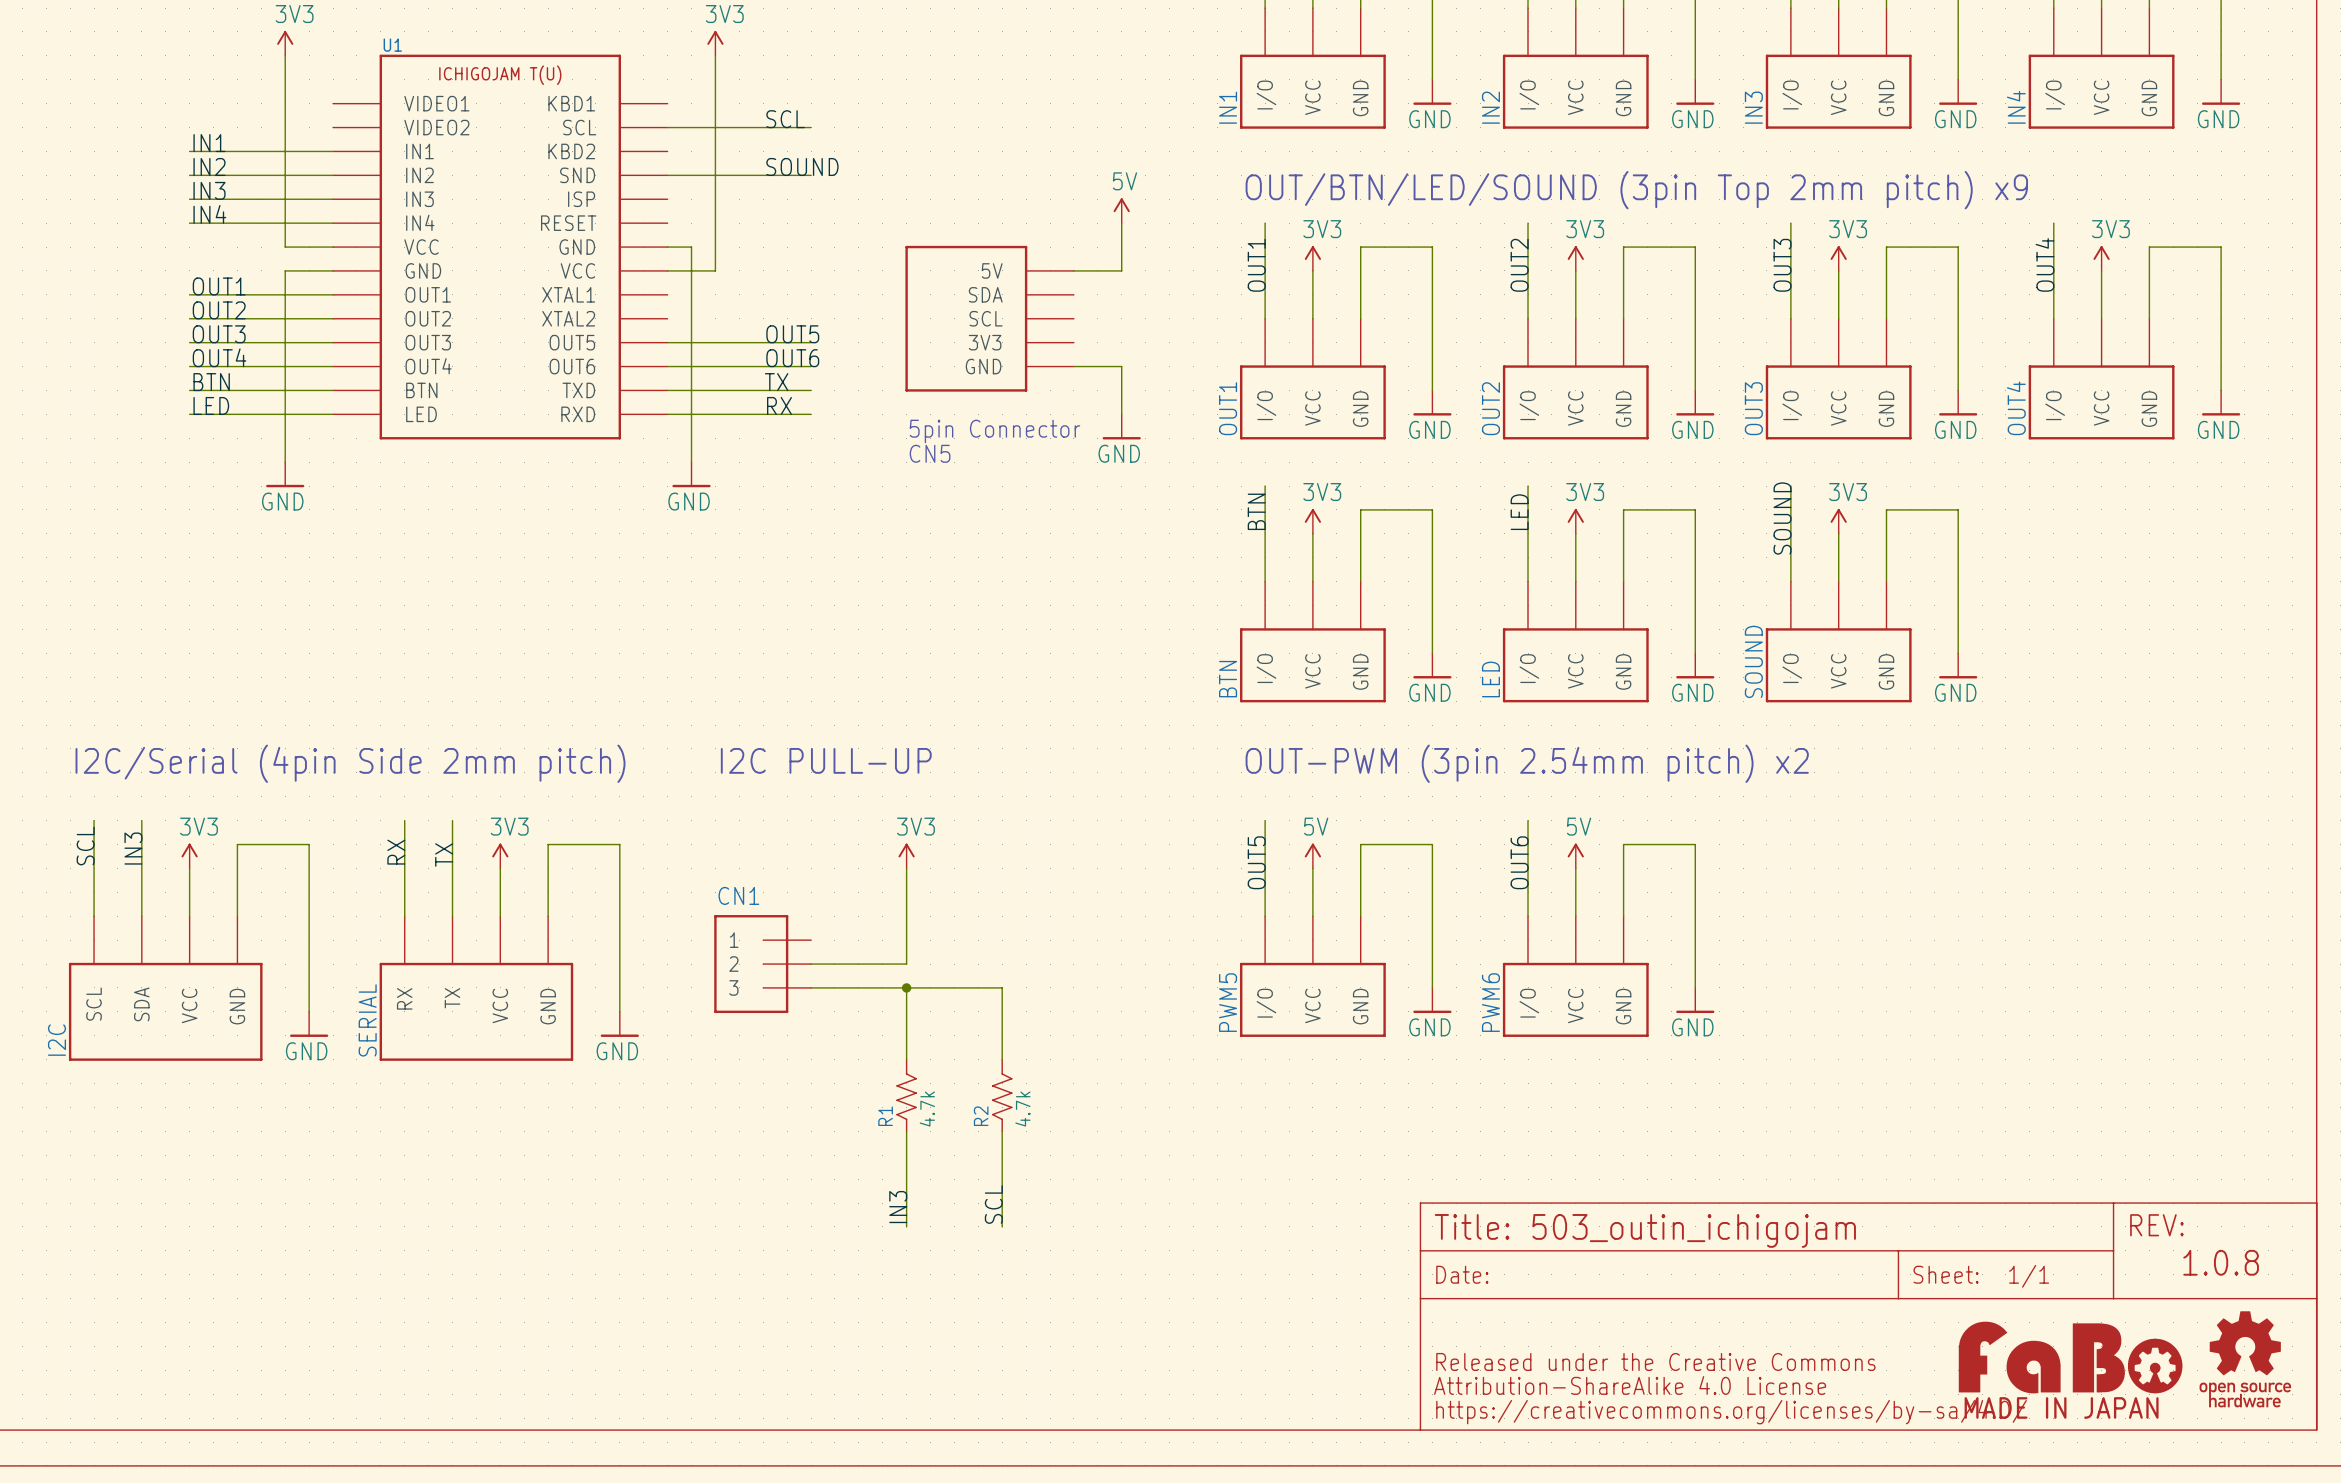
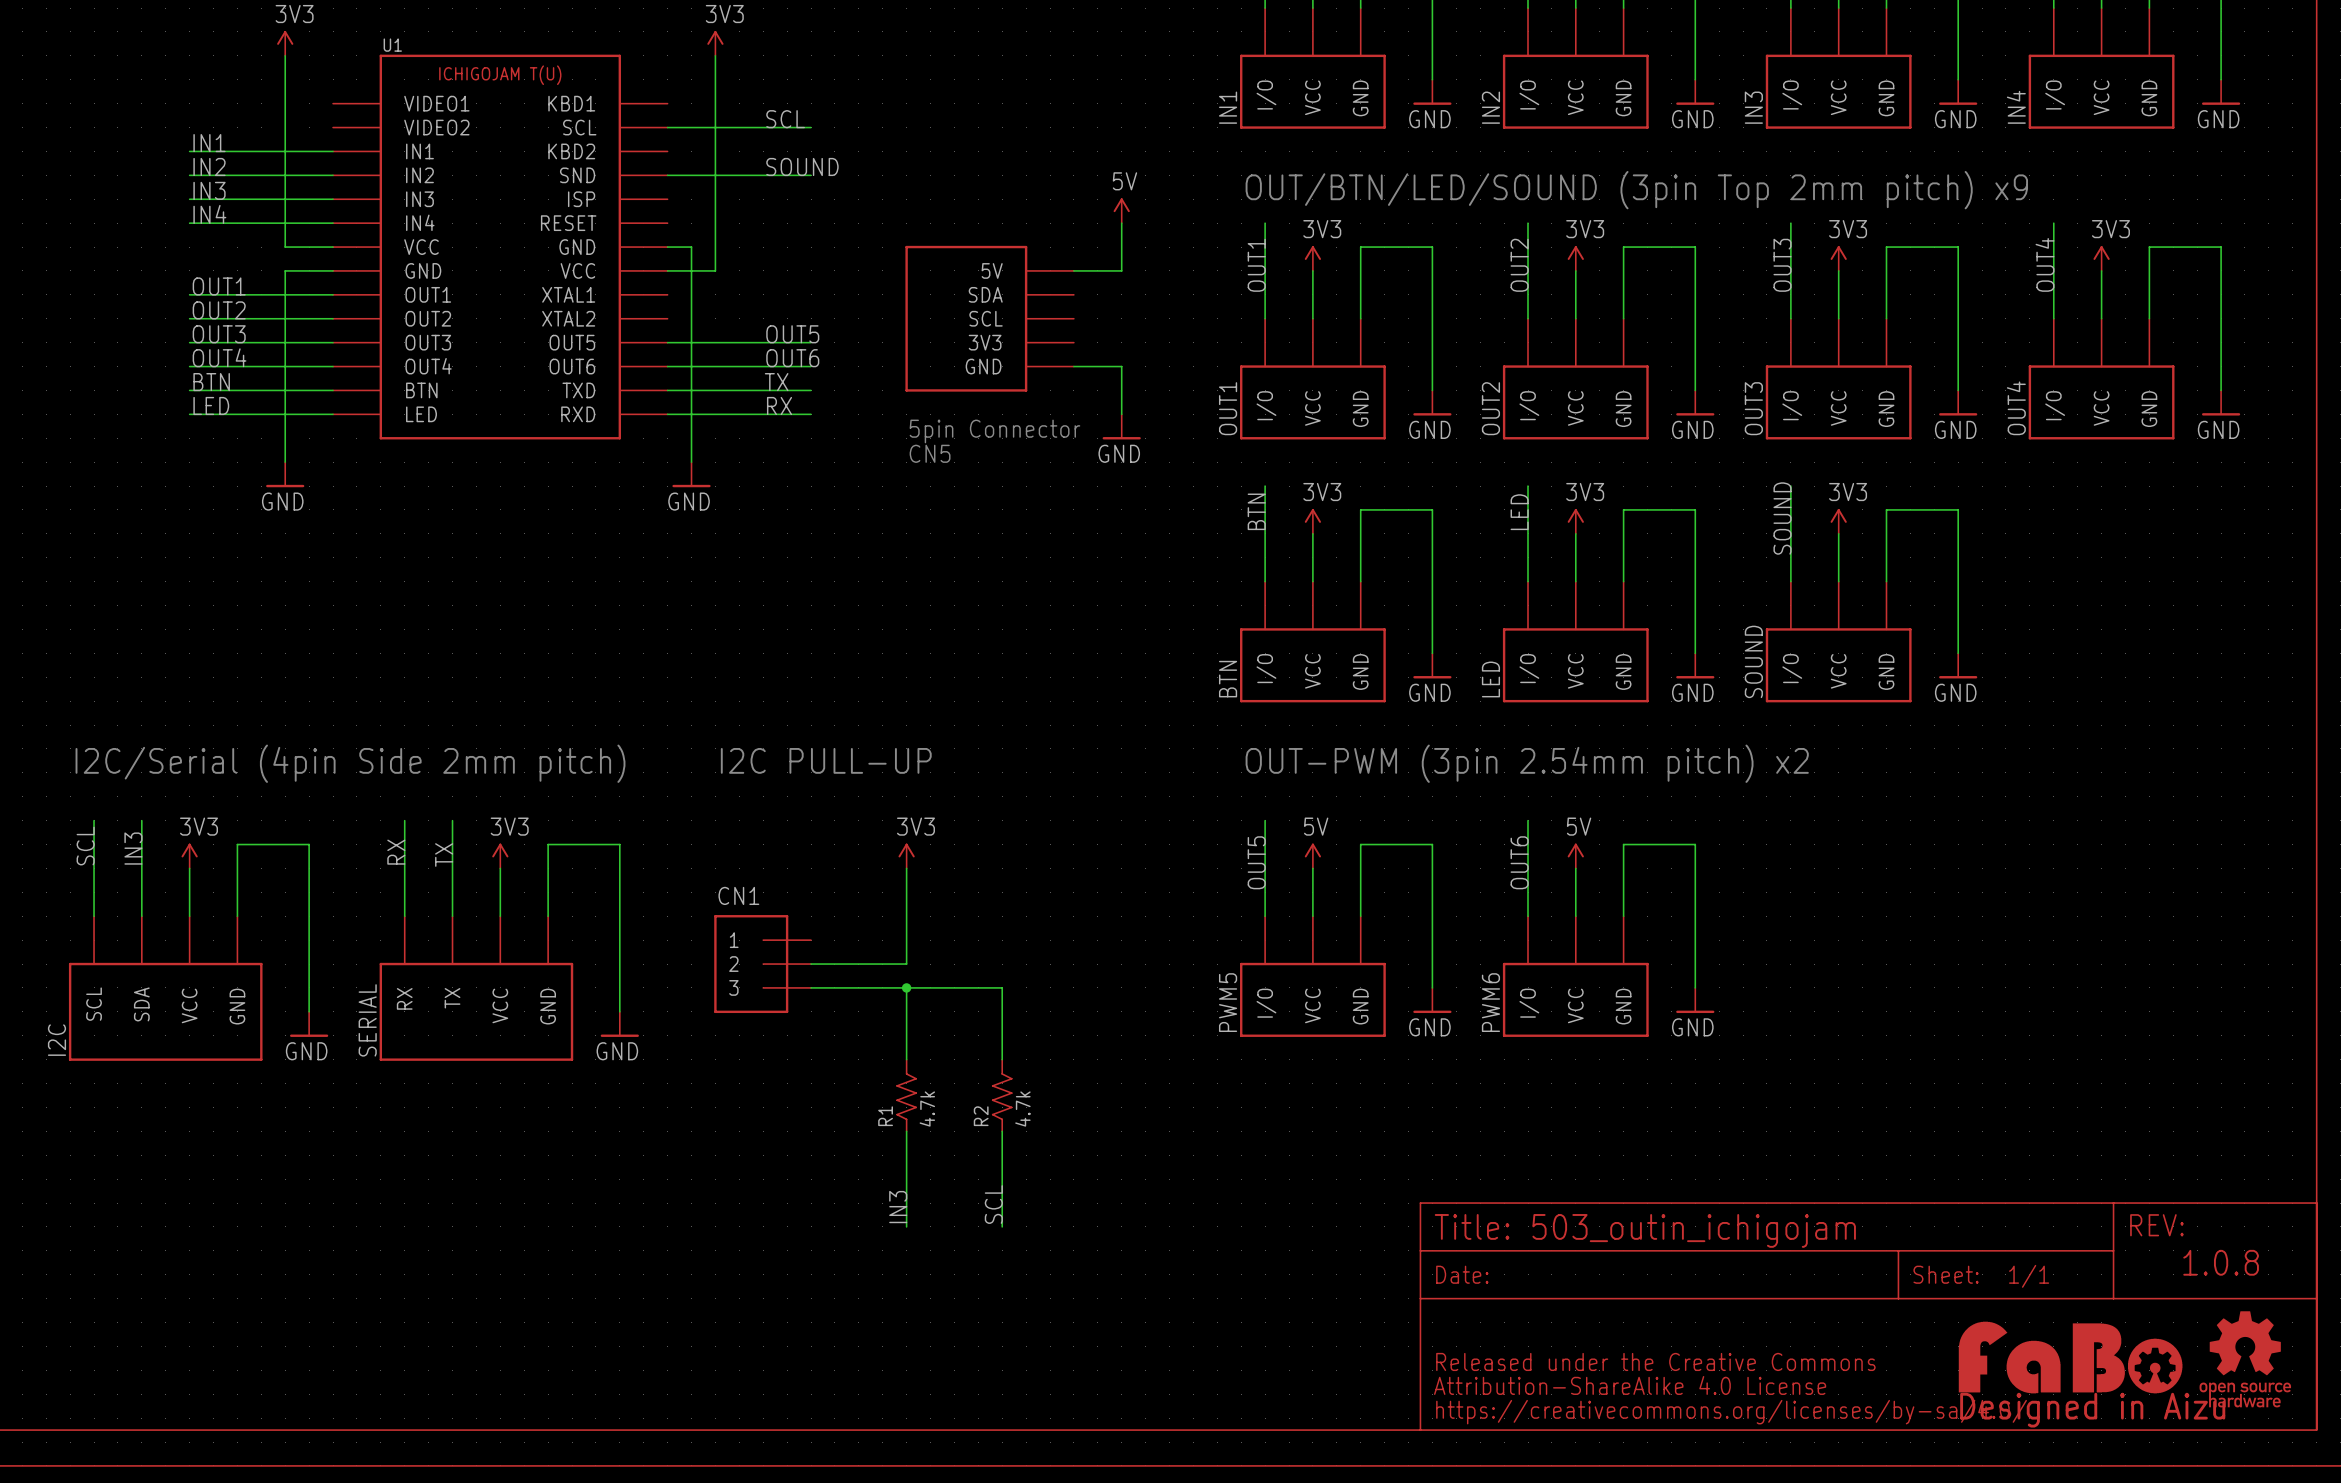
part text: MADE IN JAPAN (2061, 1407) -> none
part text: none -> Designed in Aizu (2092, 1410)

